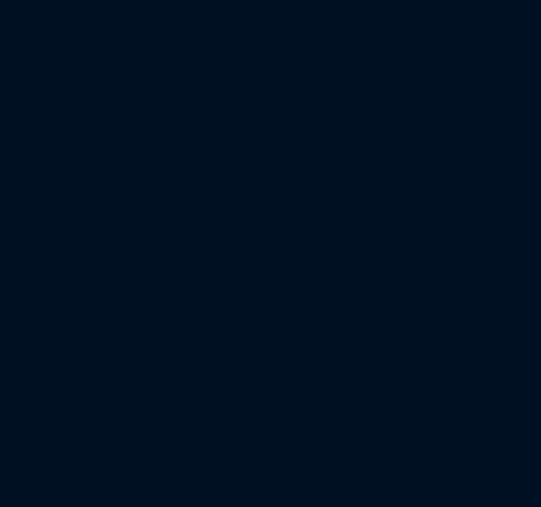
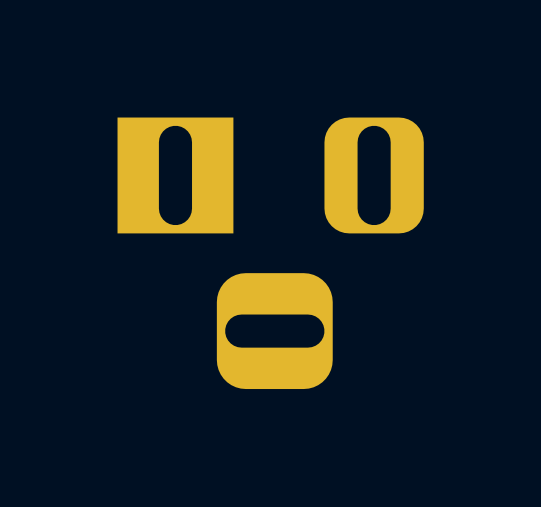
part: none -> (270, 253)

